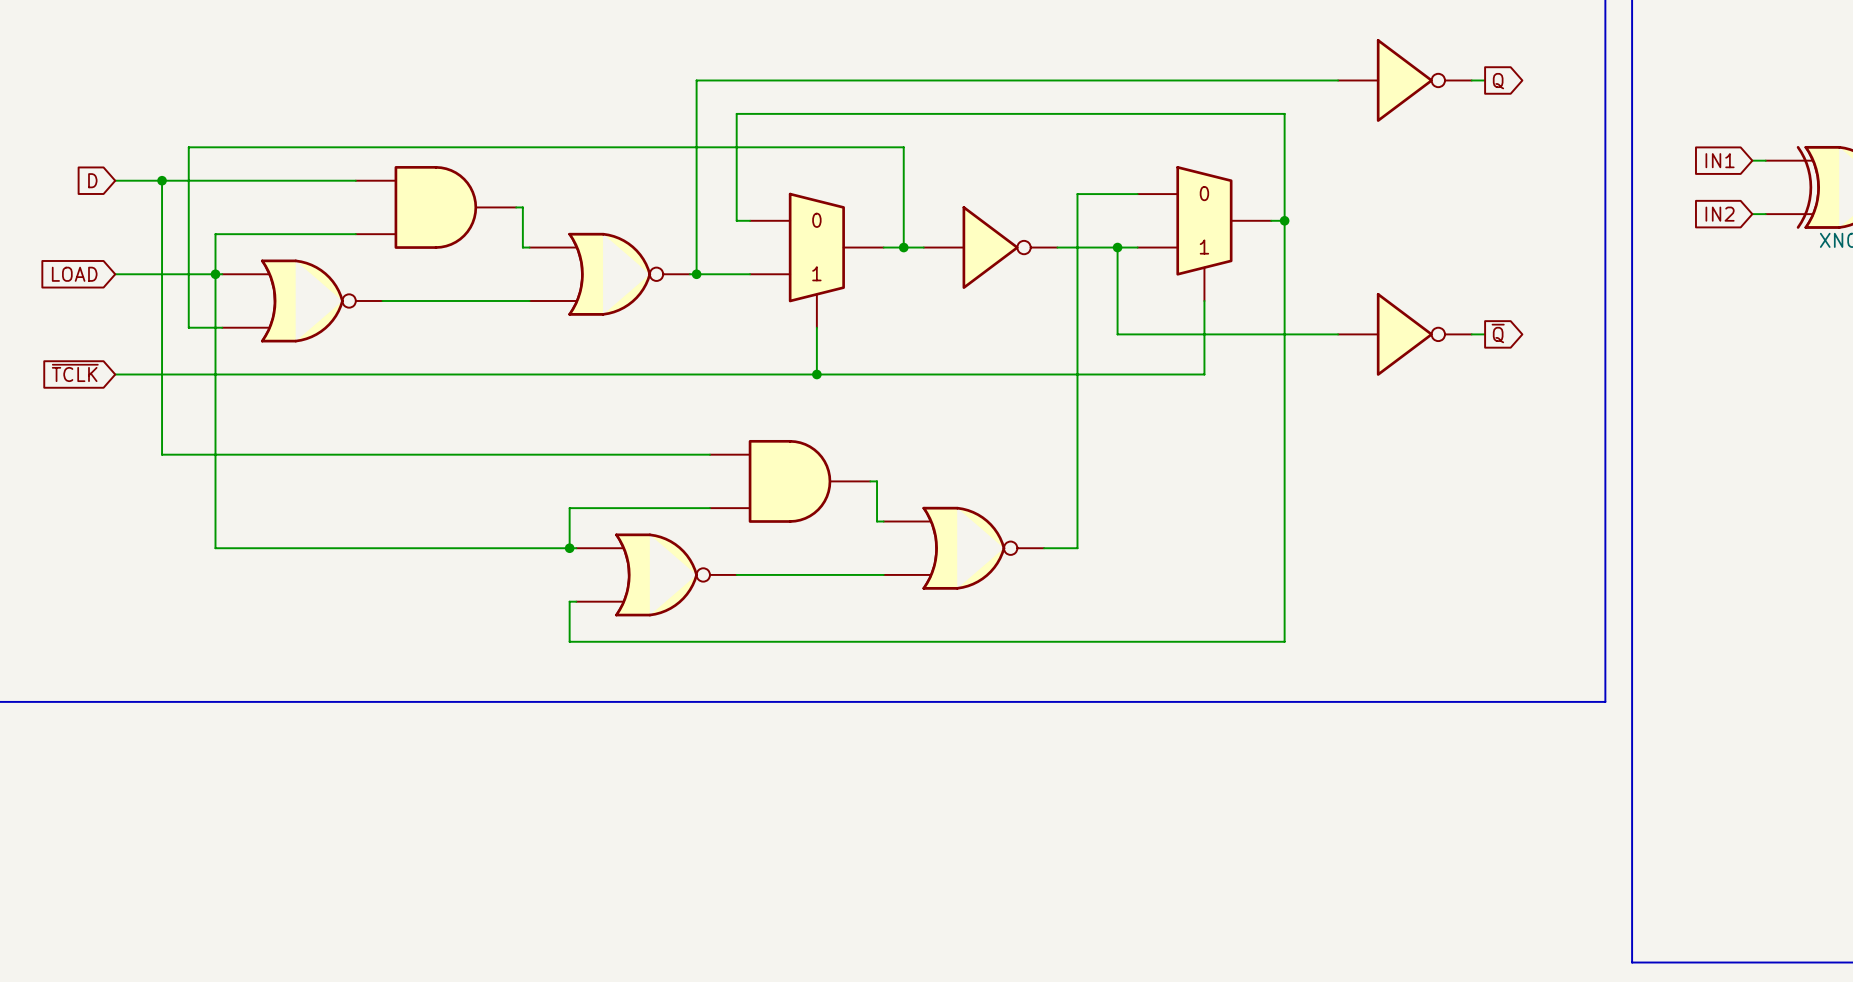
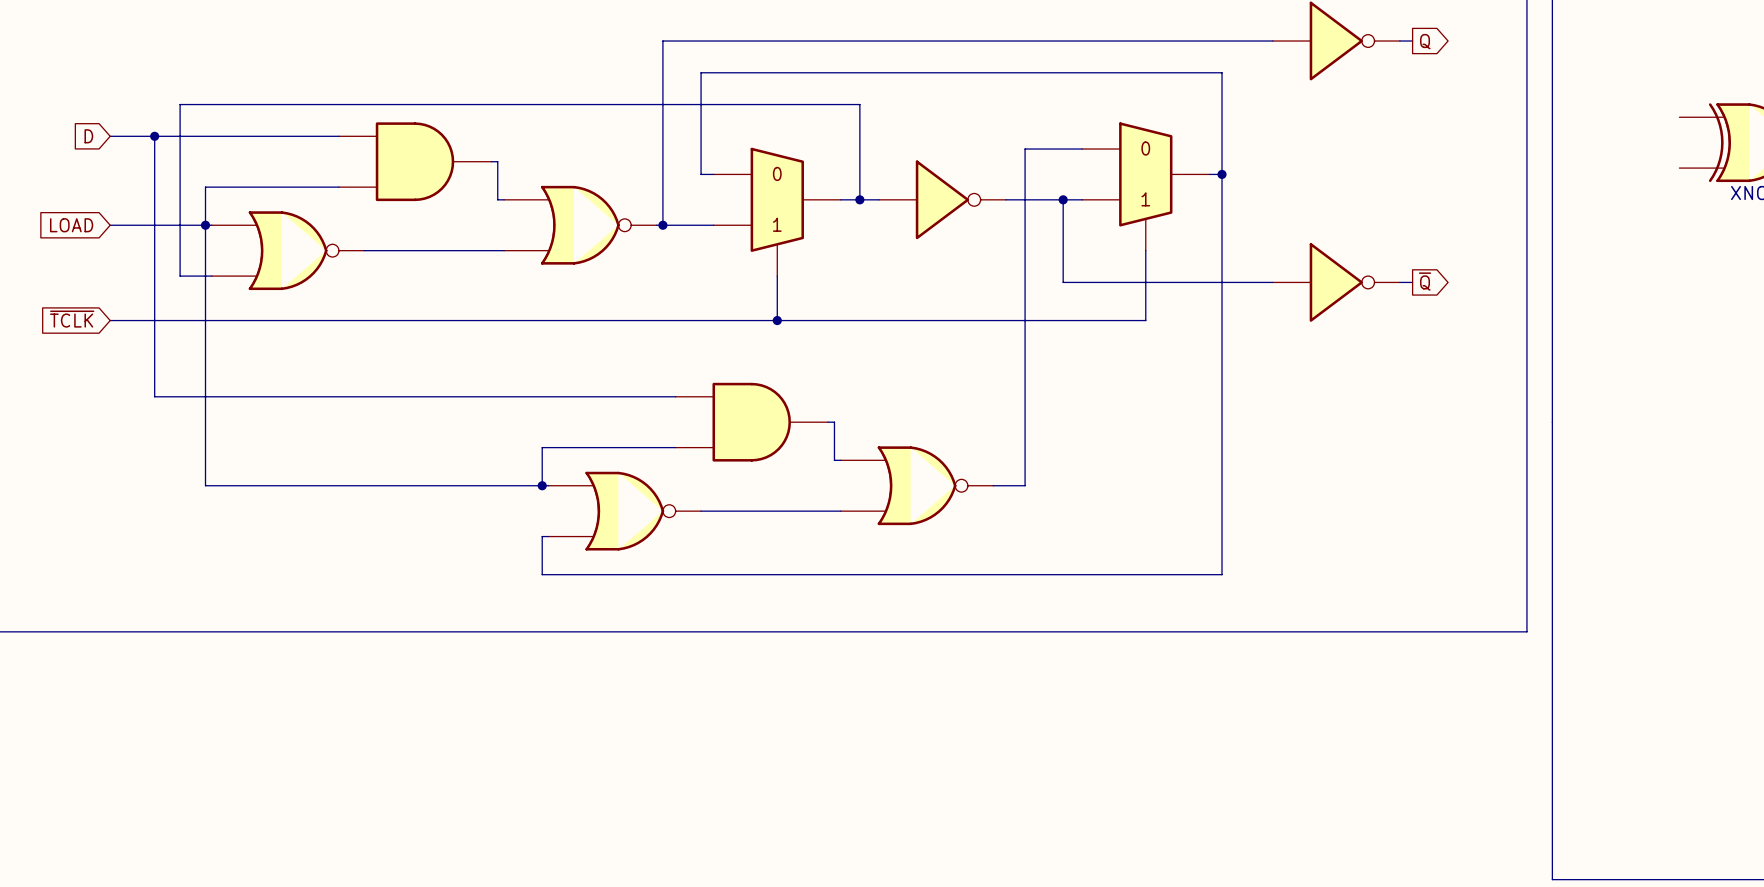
global label: IN1 (1720, 160) -> none
wire: (1752, 160) (1765, 160) -> none
global label: IN2 (1720, 214) -> none
wire: (1752, 214) (1765, 214) -> none

